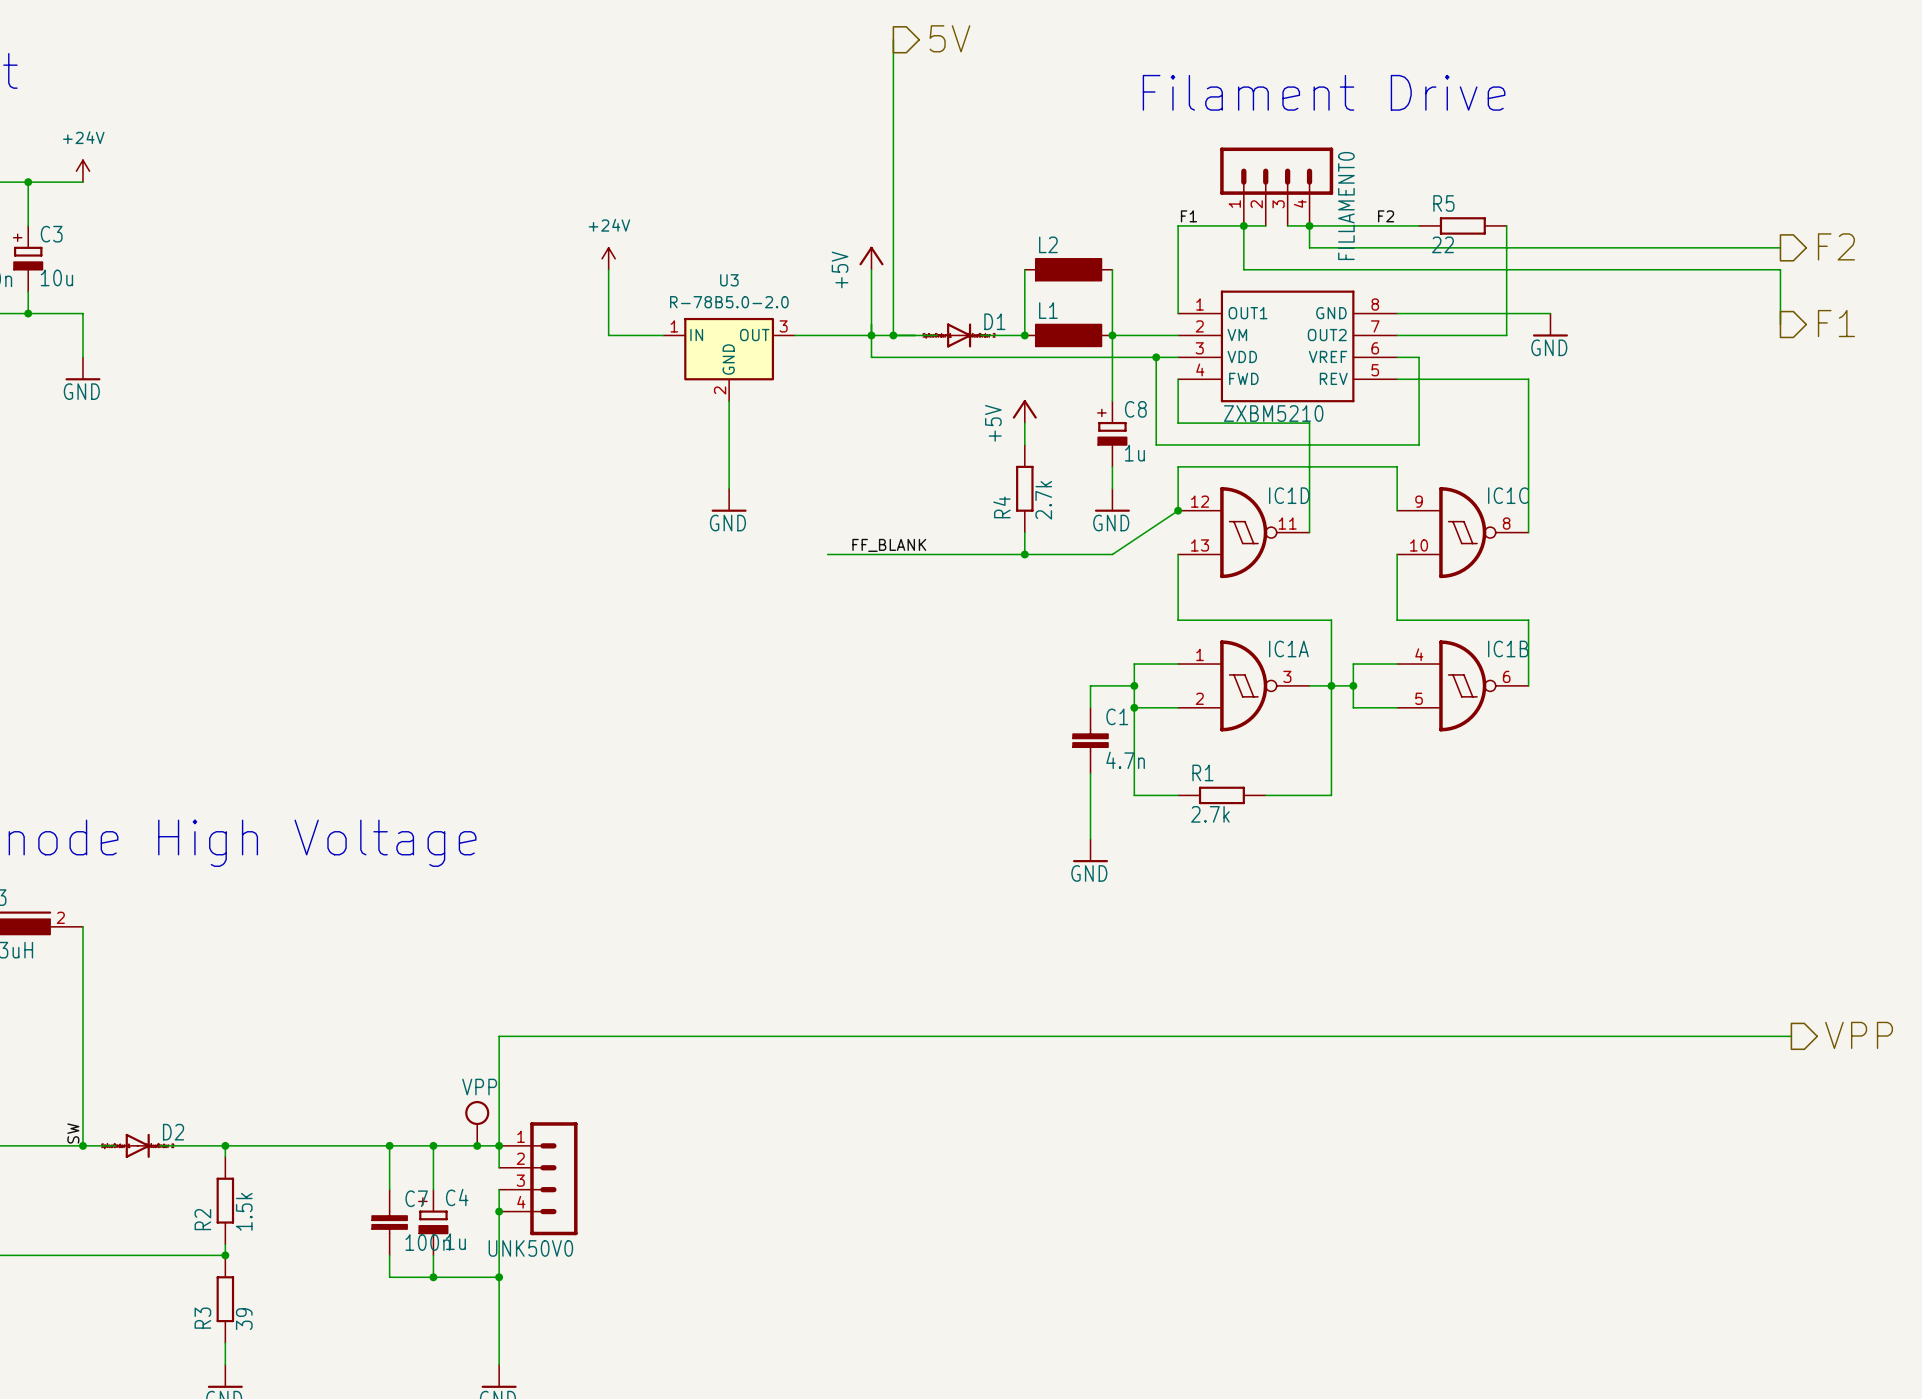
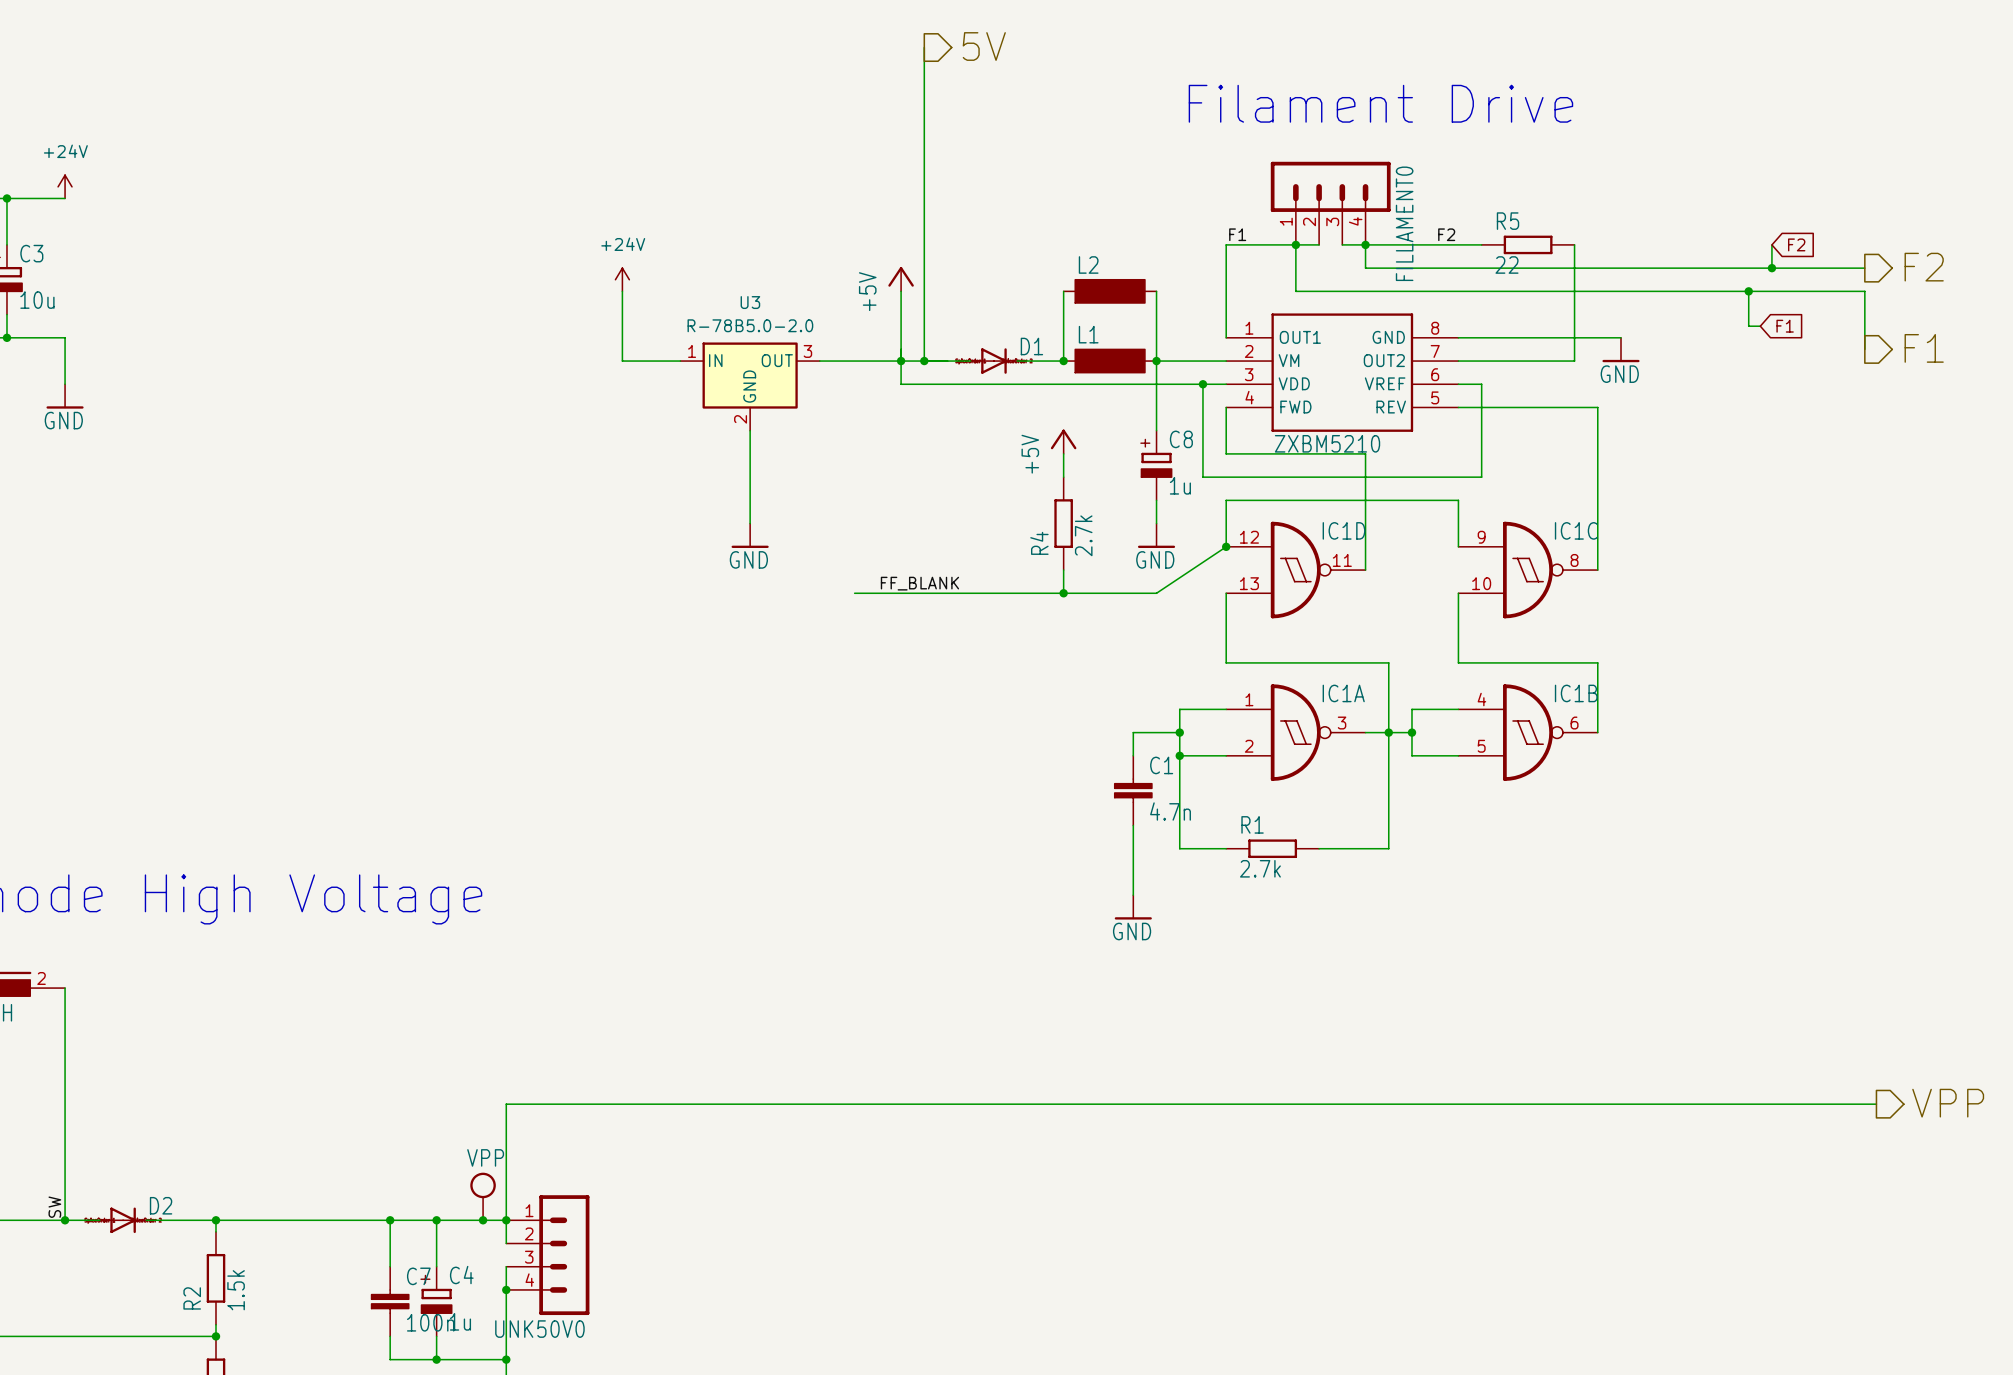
wire: none -> (1771, 244) (1771, 268)
global label: none -> F2 (1796, 244)
junction: none -> (1771, 268)
wire: none -> (1748, 291) (1748, 326) (1760, 326)
junction: none -> (1748, 291)
global label: none -> F1 (1785, 326)

